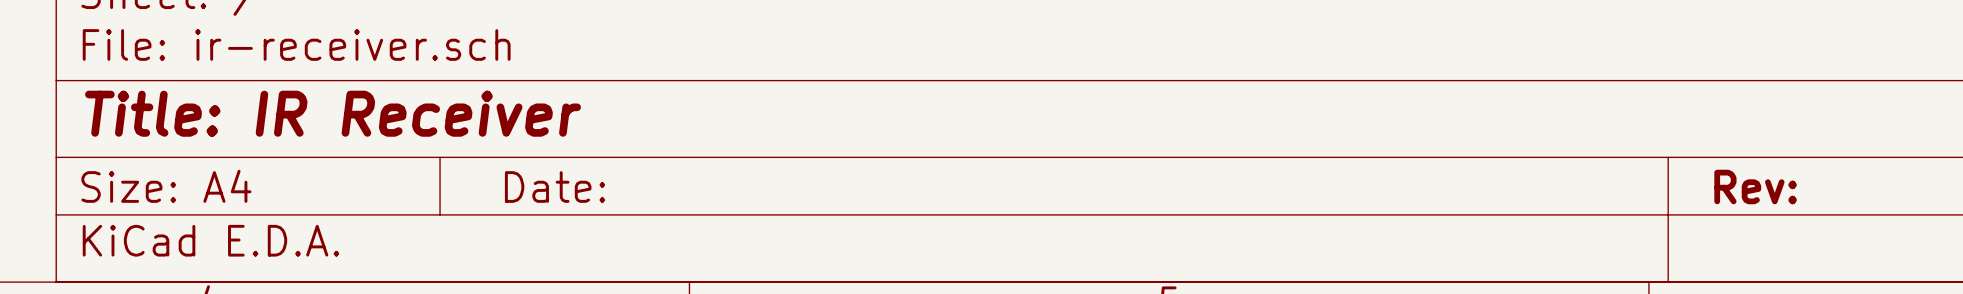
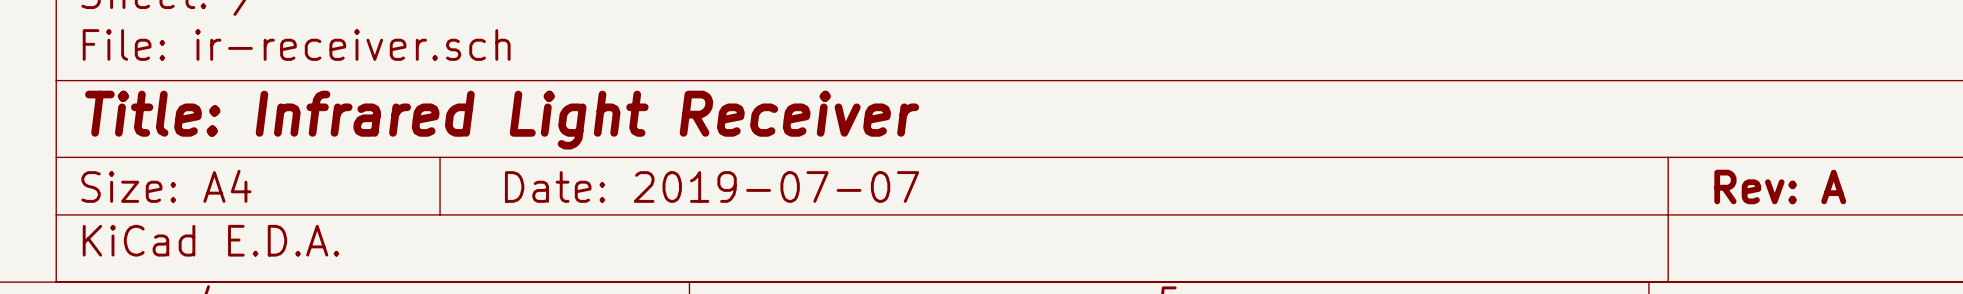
title block: Title: IR Receiver (333, 113) -> Title: Infrared Light Receiver (502, 120)
title block: Date: (555, 186) -> Date: 2019-07-07 (711, 186)
title block: Rev: (1755, 186) -> Rev: A (1780, 186)

